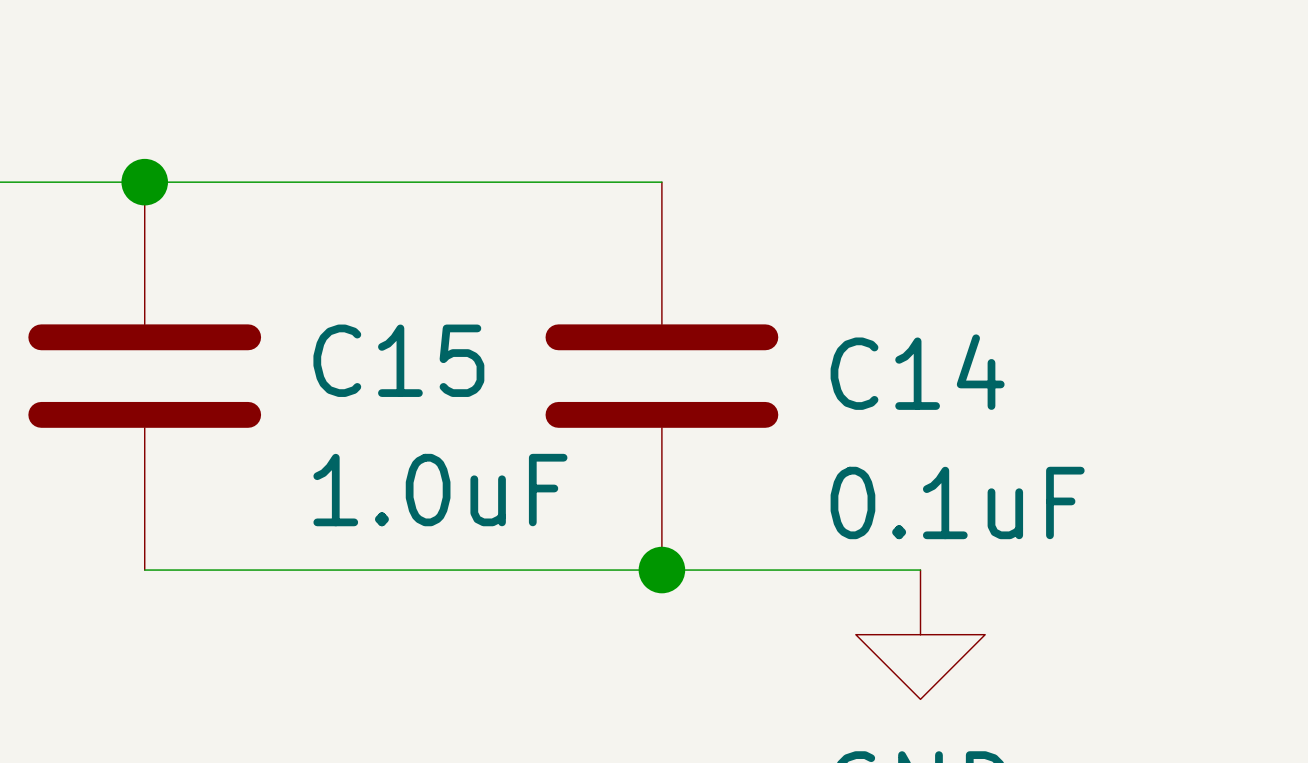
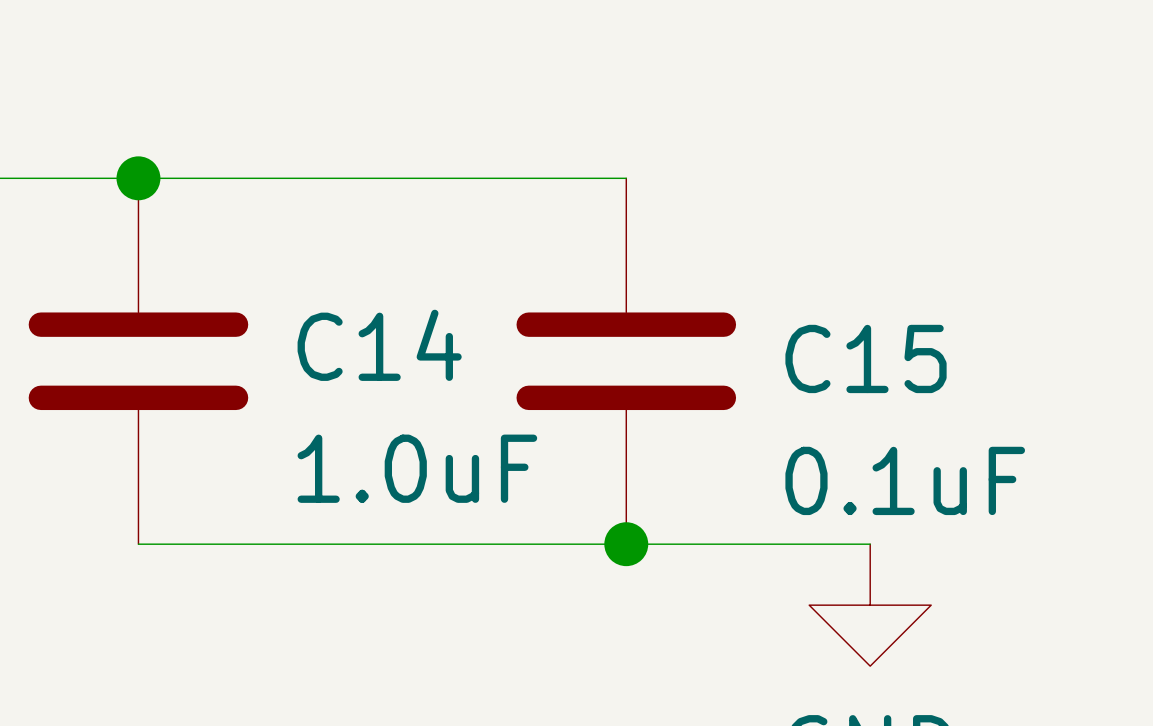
C15 name: C15 (398, 360) -> C14 (379, 345)
C14 name: C14 (917, 372) -> C15 (866, 358)

